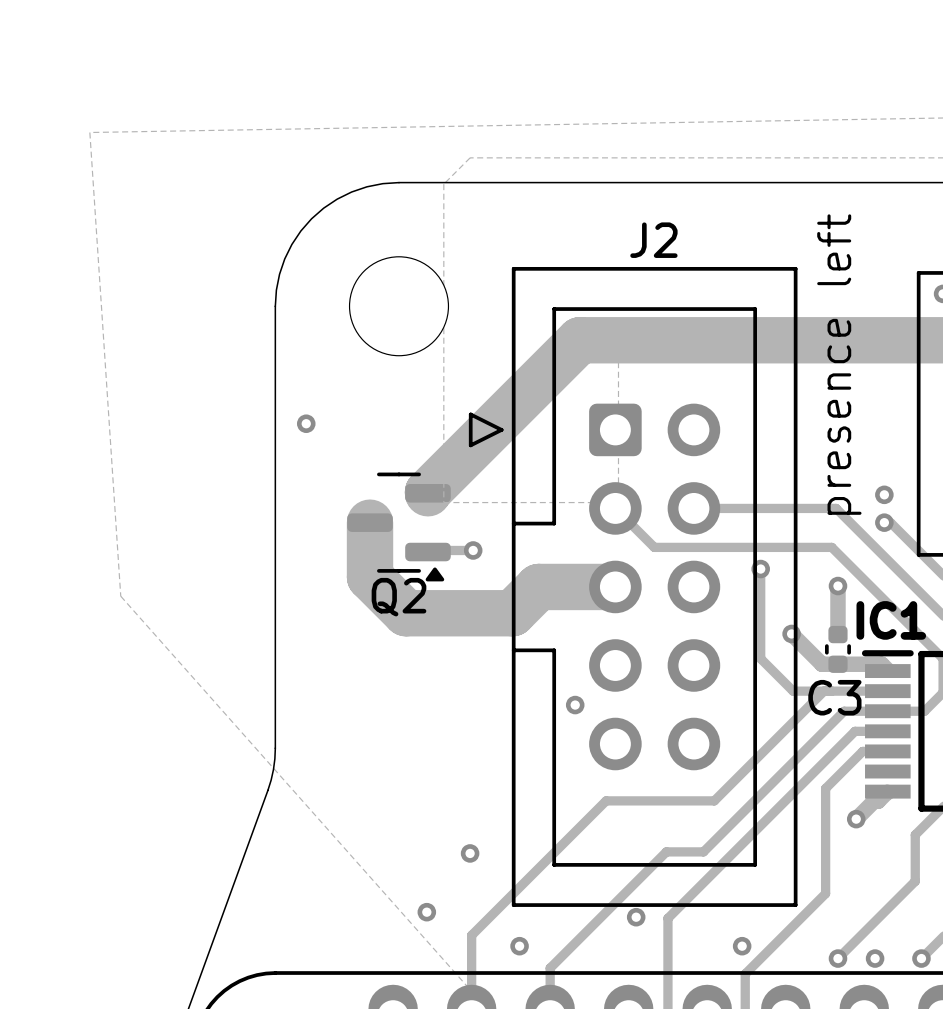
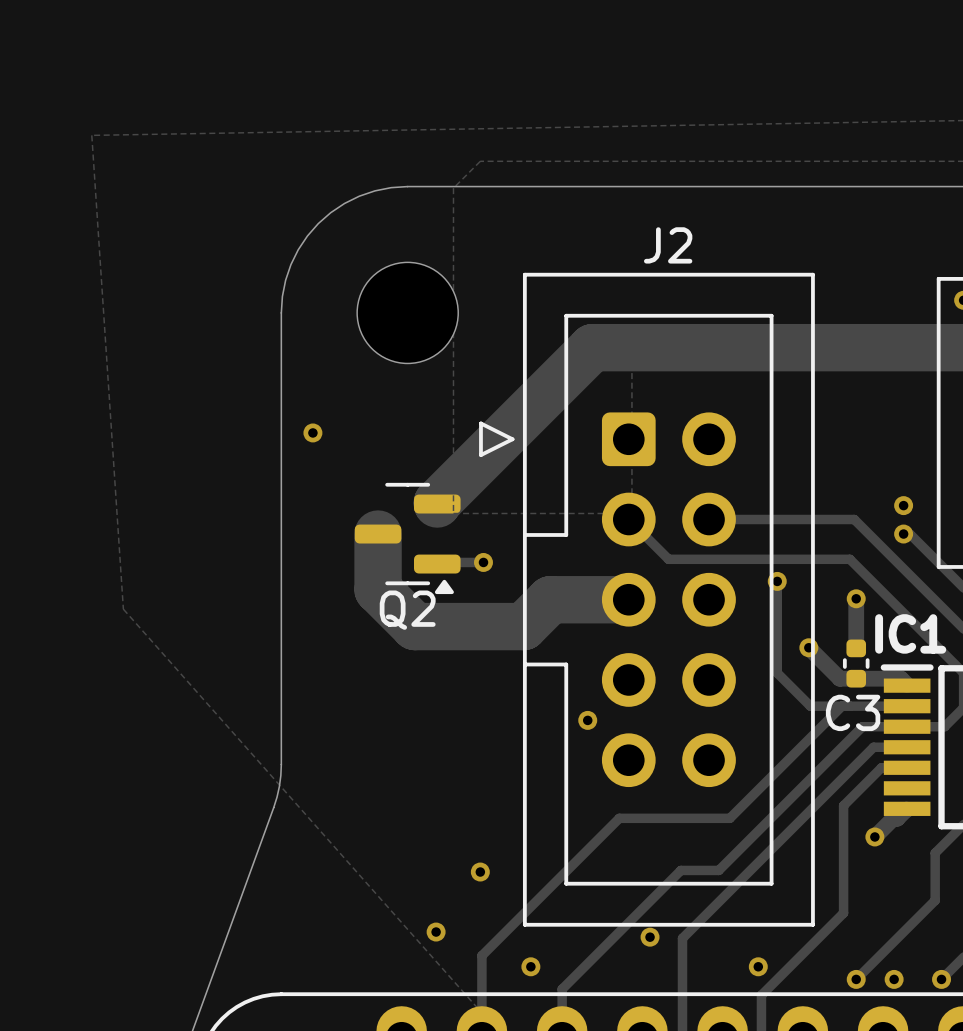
text: presence left (839, 364) -> none

